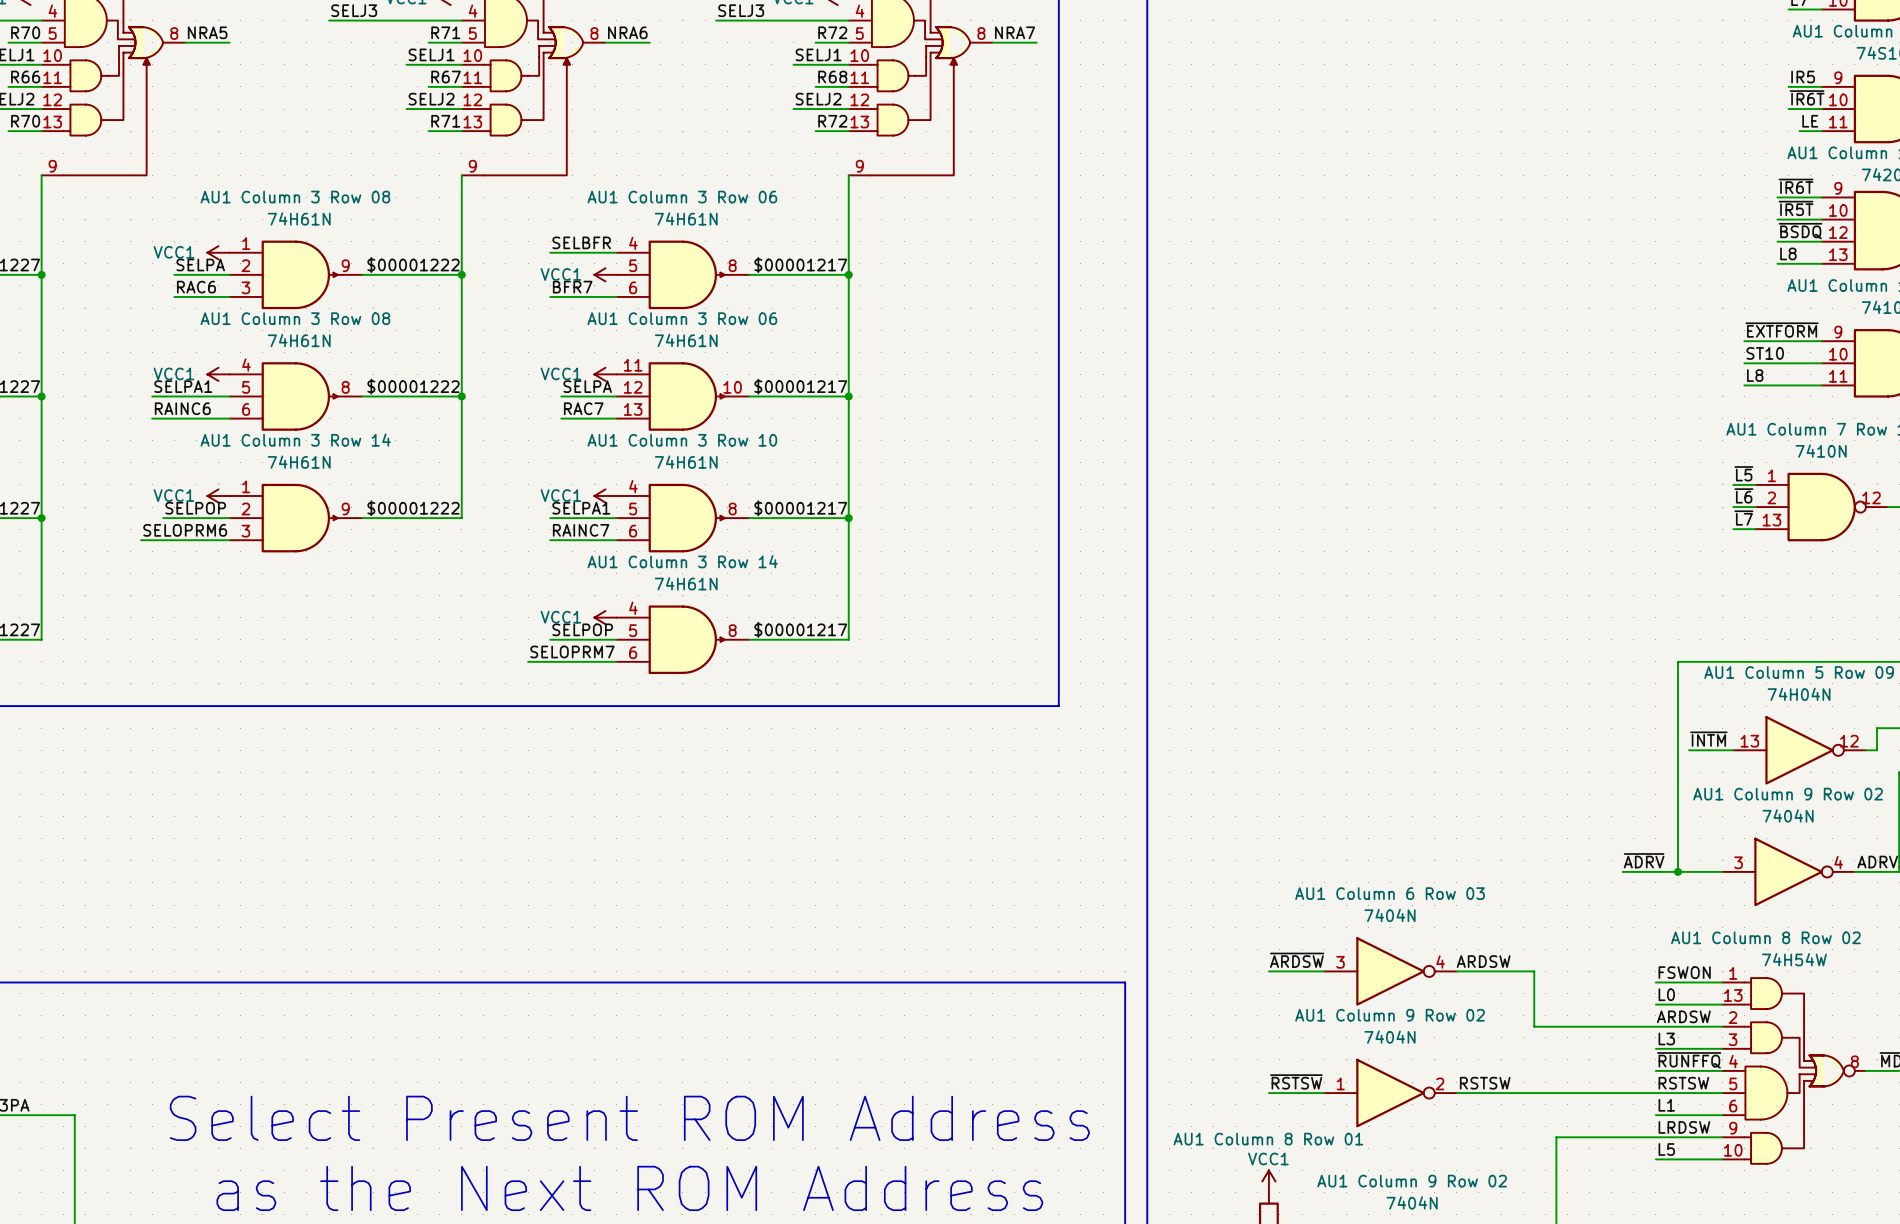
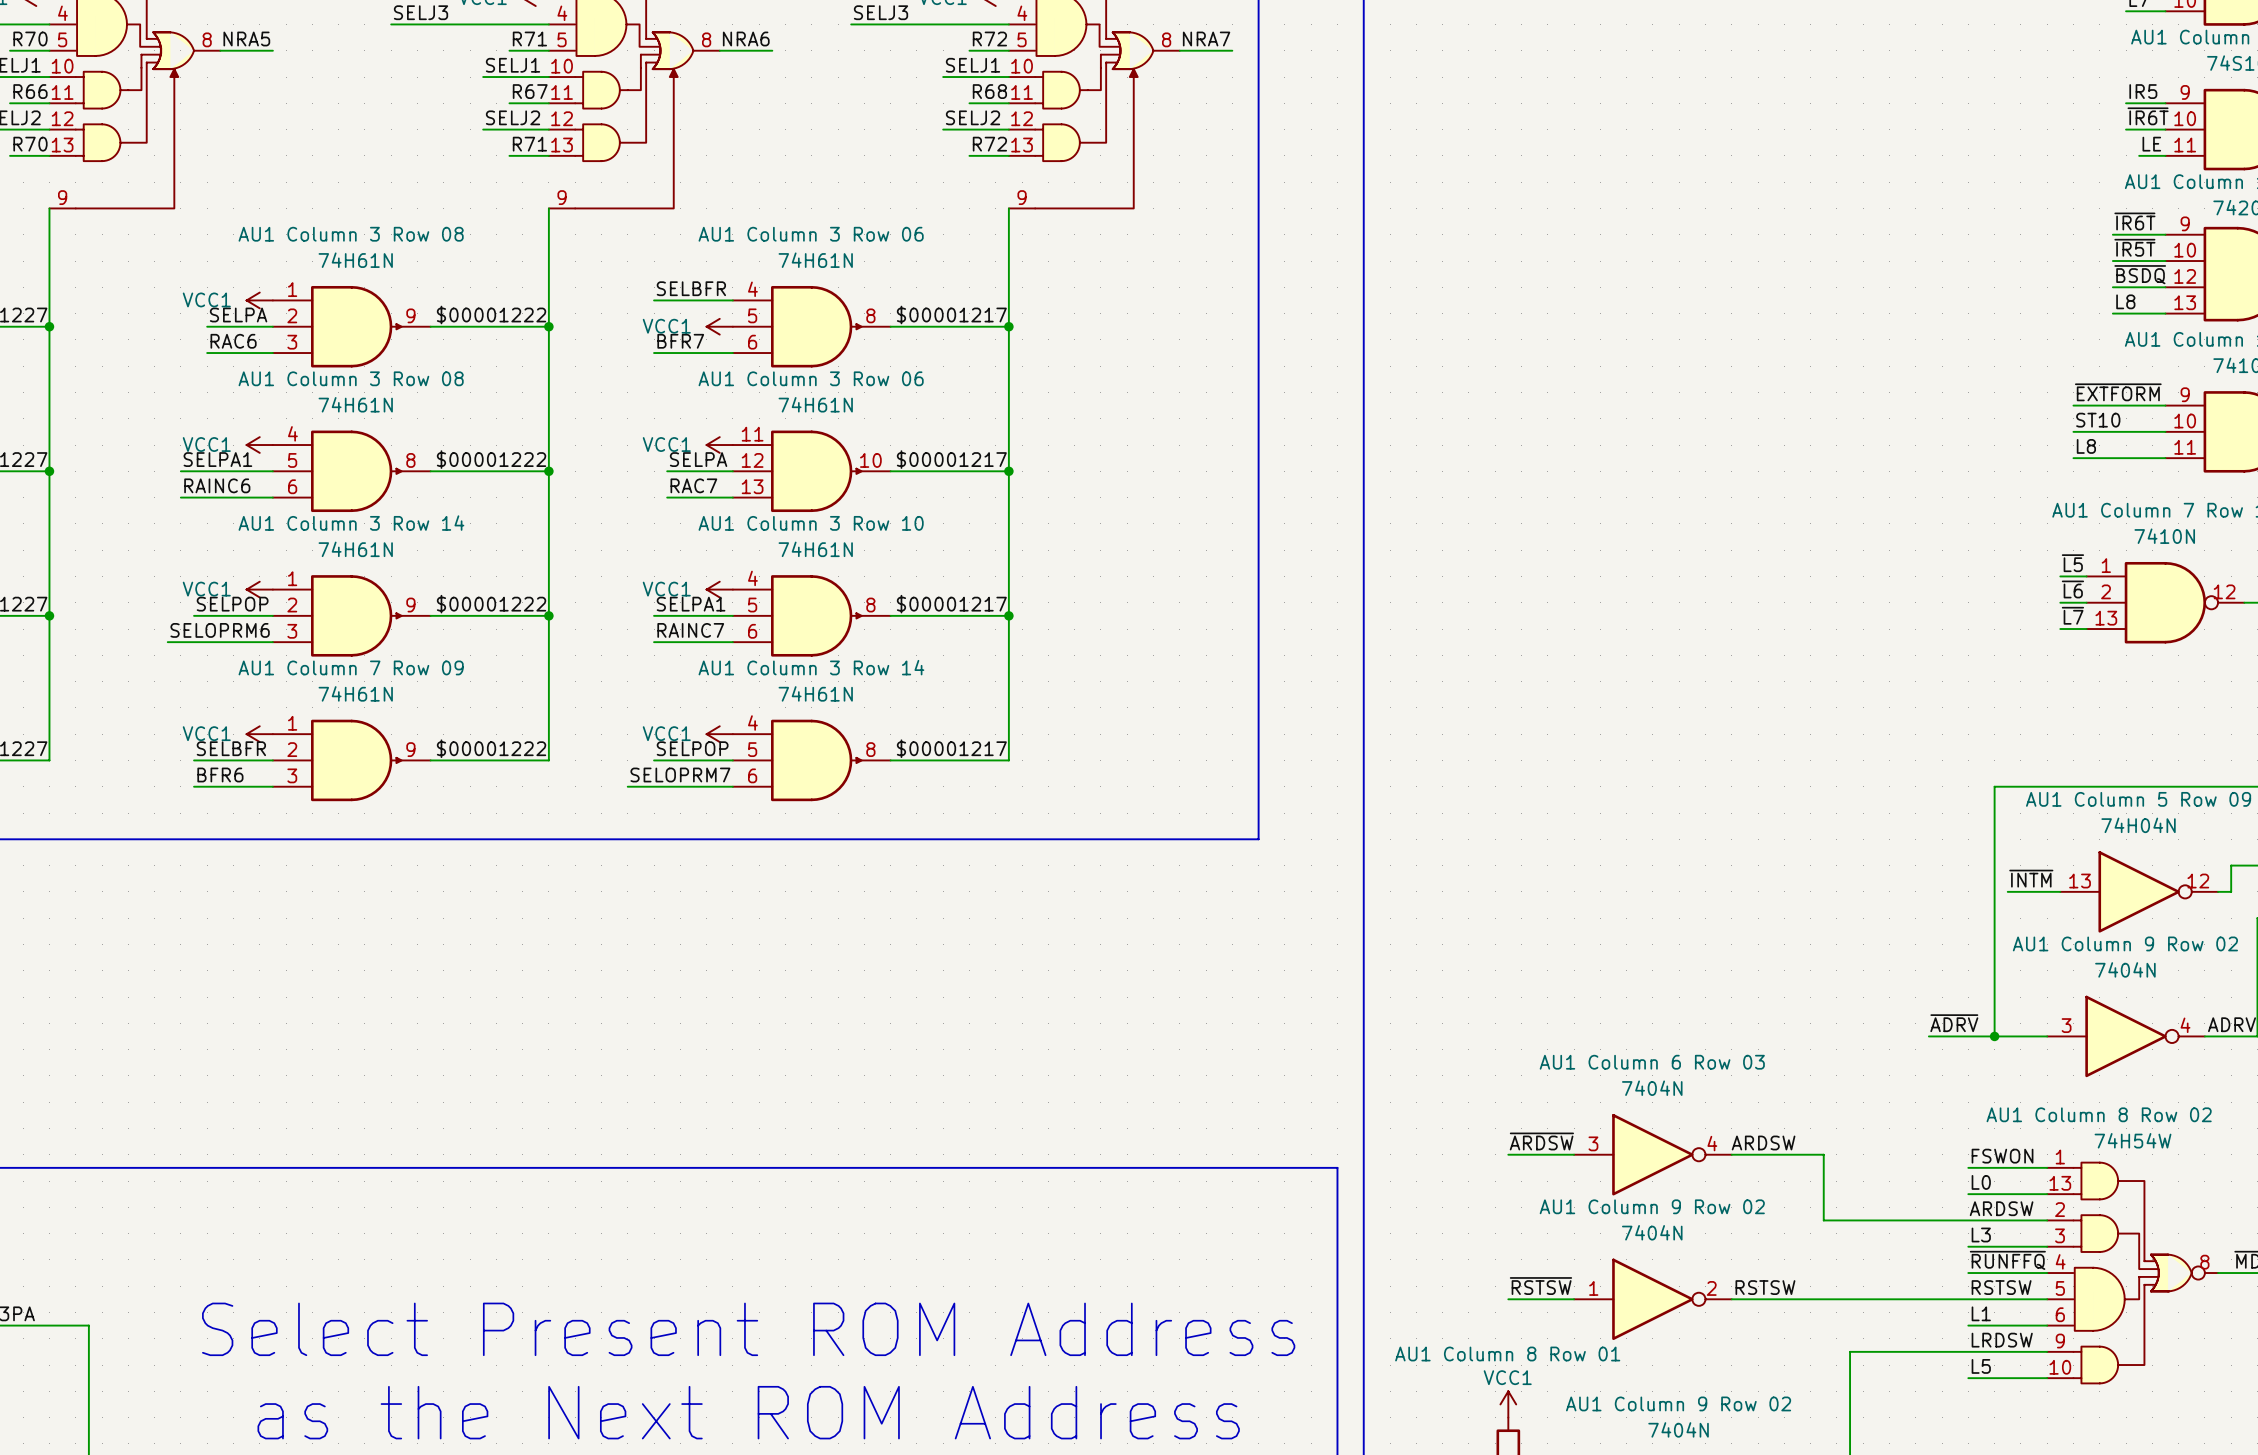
wire: none -> (548, 615) (548, 760) (430, 760)
junction: none -> (548, 615)
power symbol: none -> VCC1 (259, 734)
label: none -> SELBFR (231, 748)
label: none -> $00001222 (491, 748)
wire: none -> (194, 760) (272, 760)
part: none -> 74H61N (351, 760)
label: none -> BFR6 (220, 774)
wire: none -> (194, 786) (272, 786)

